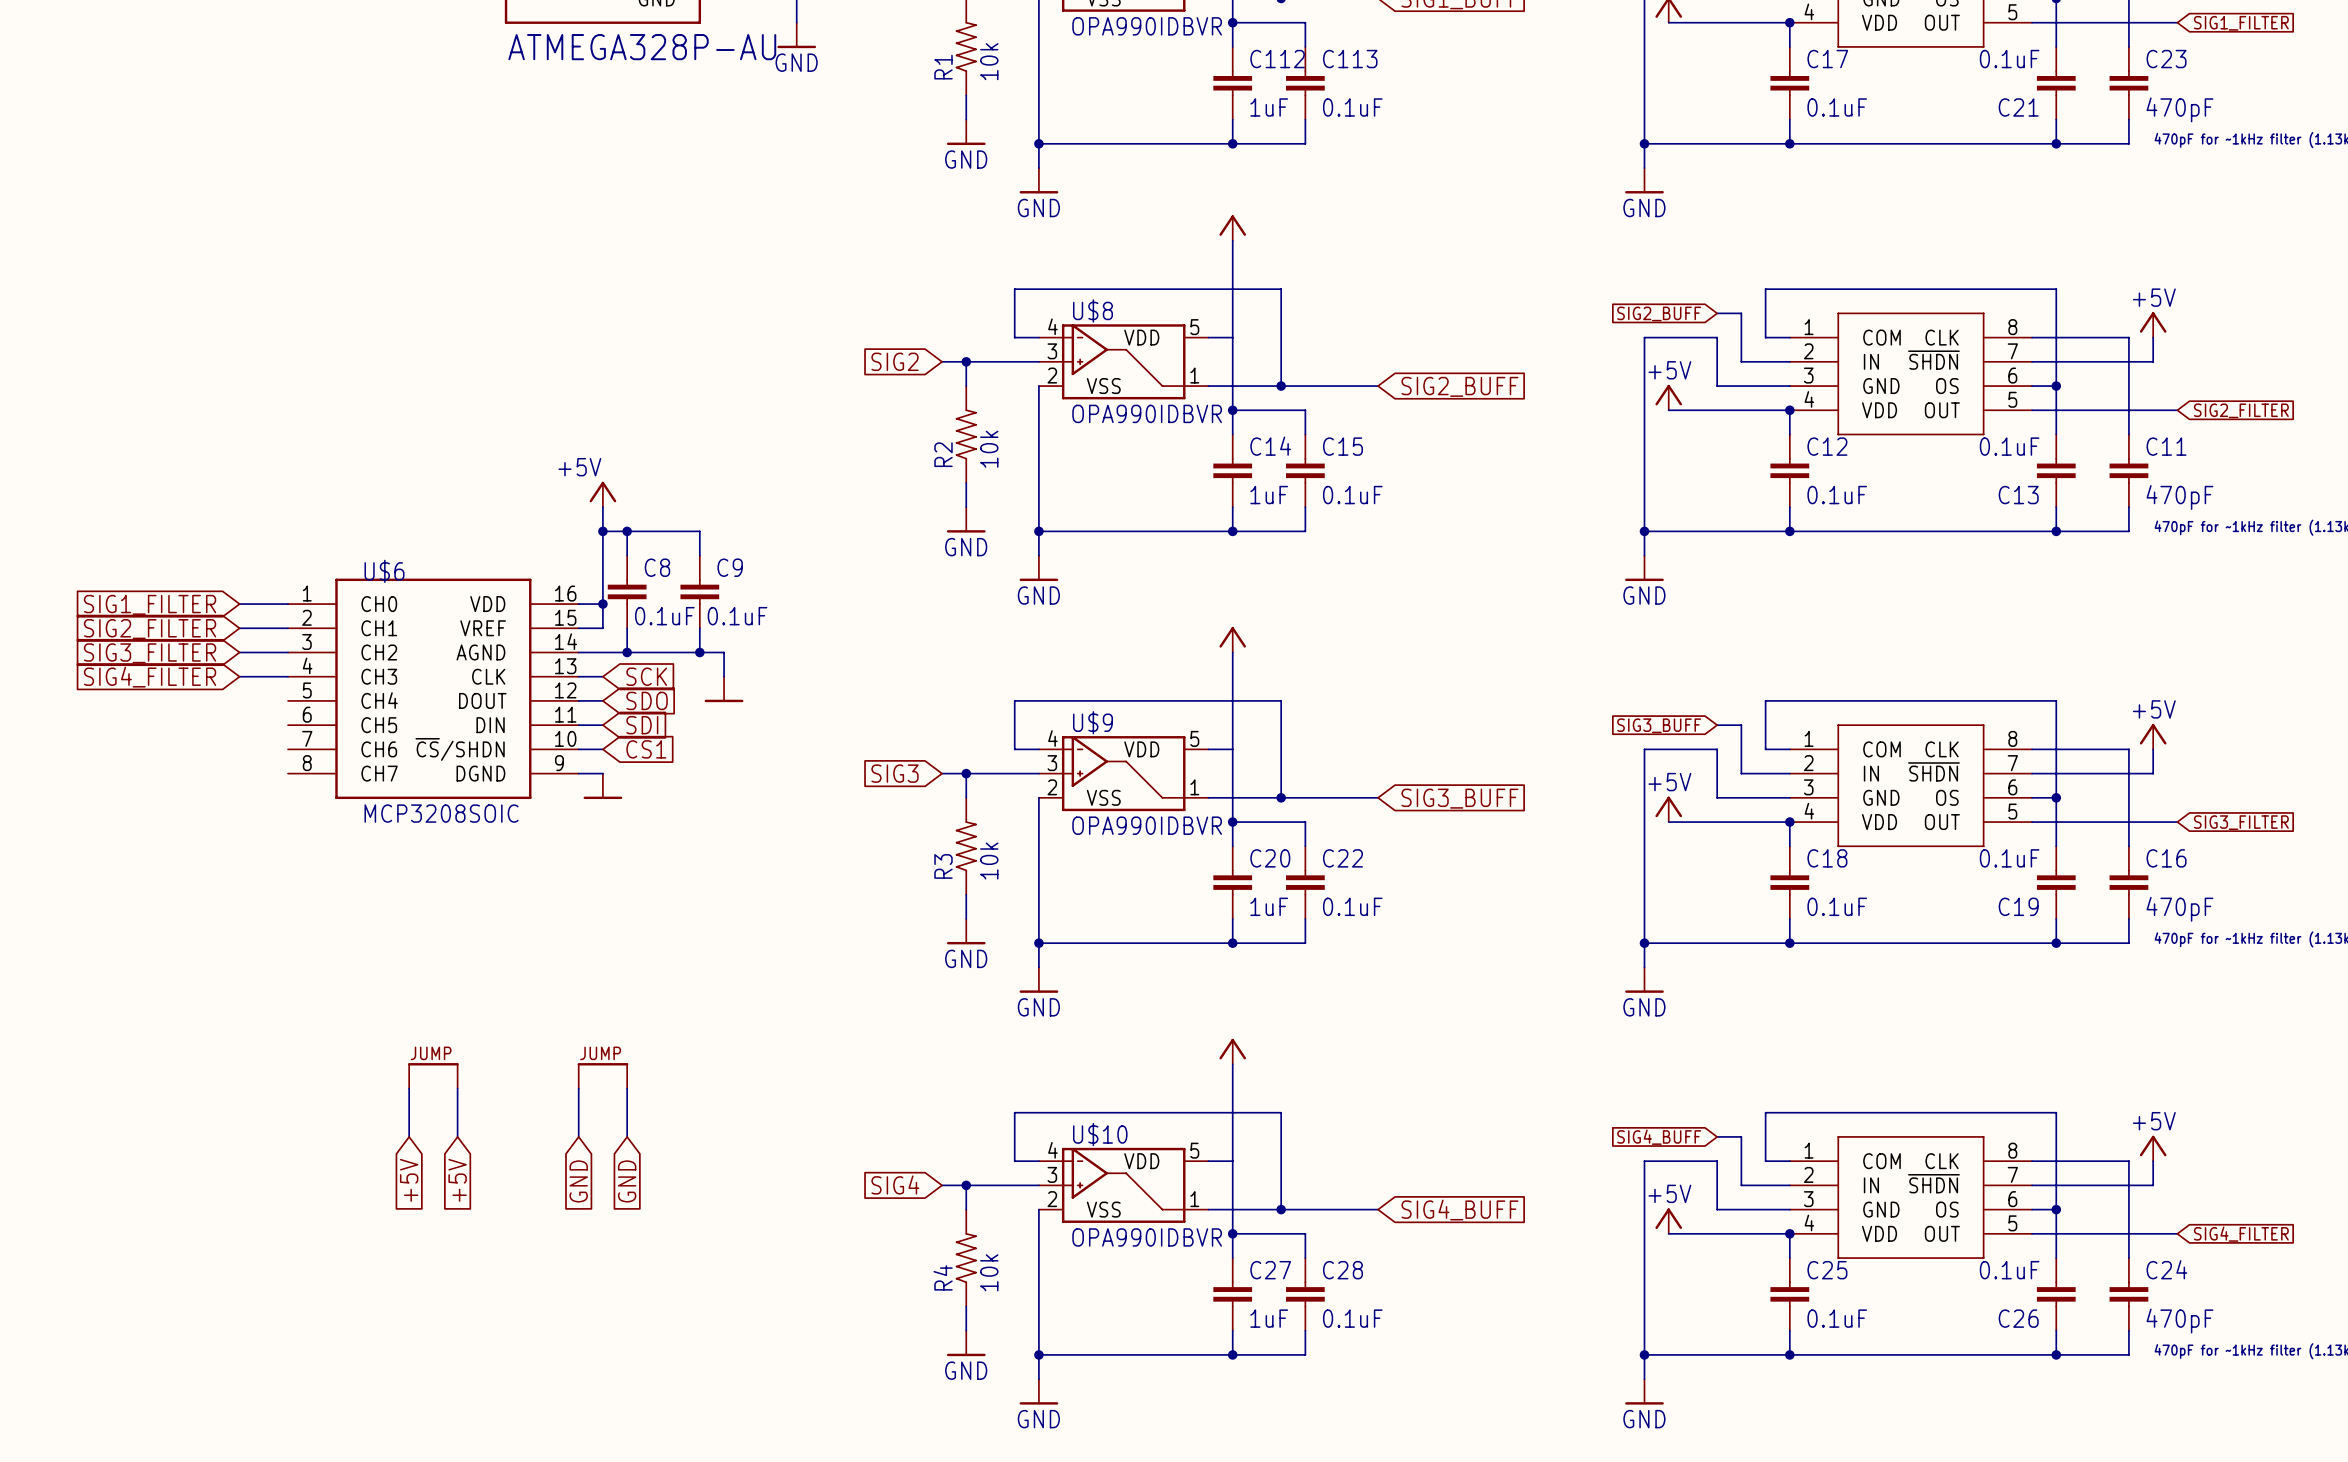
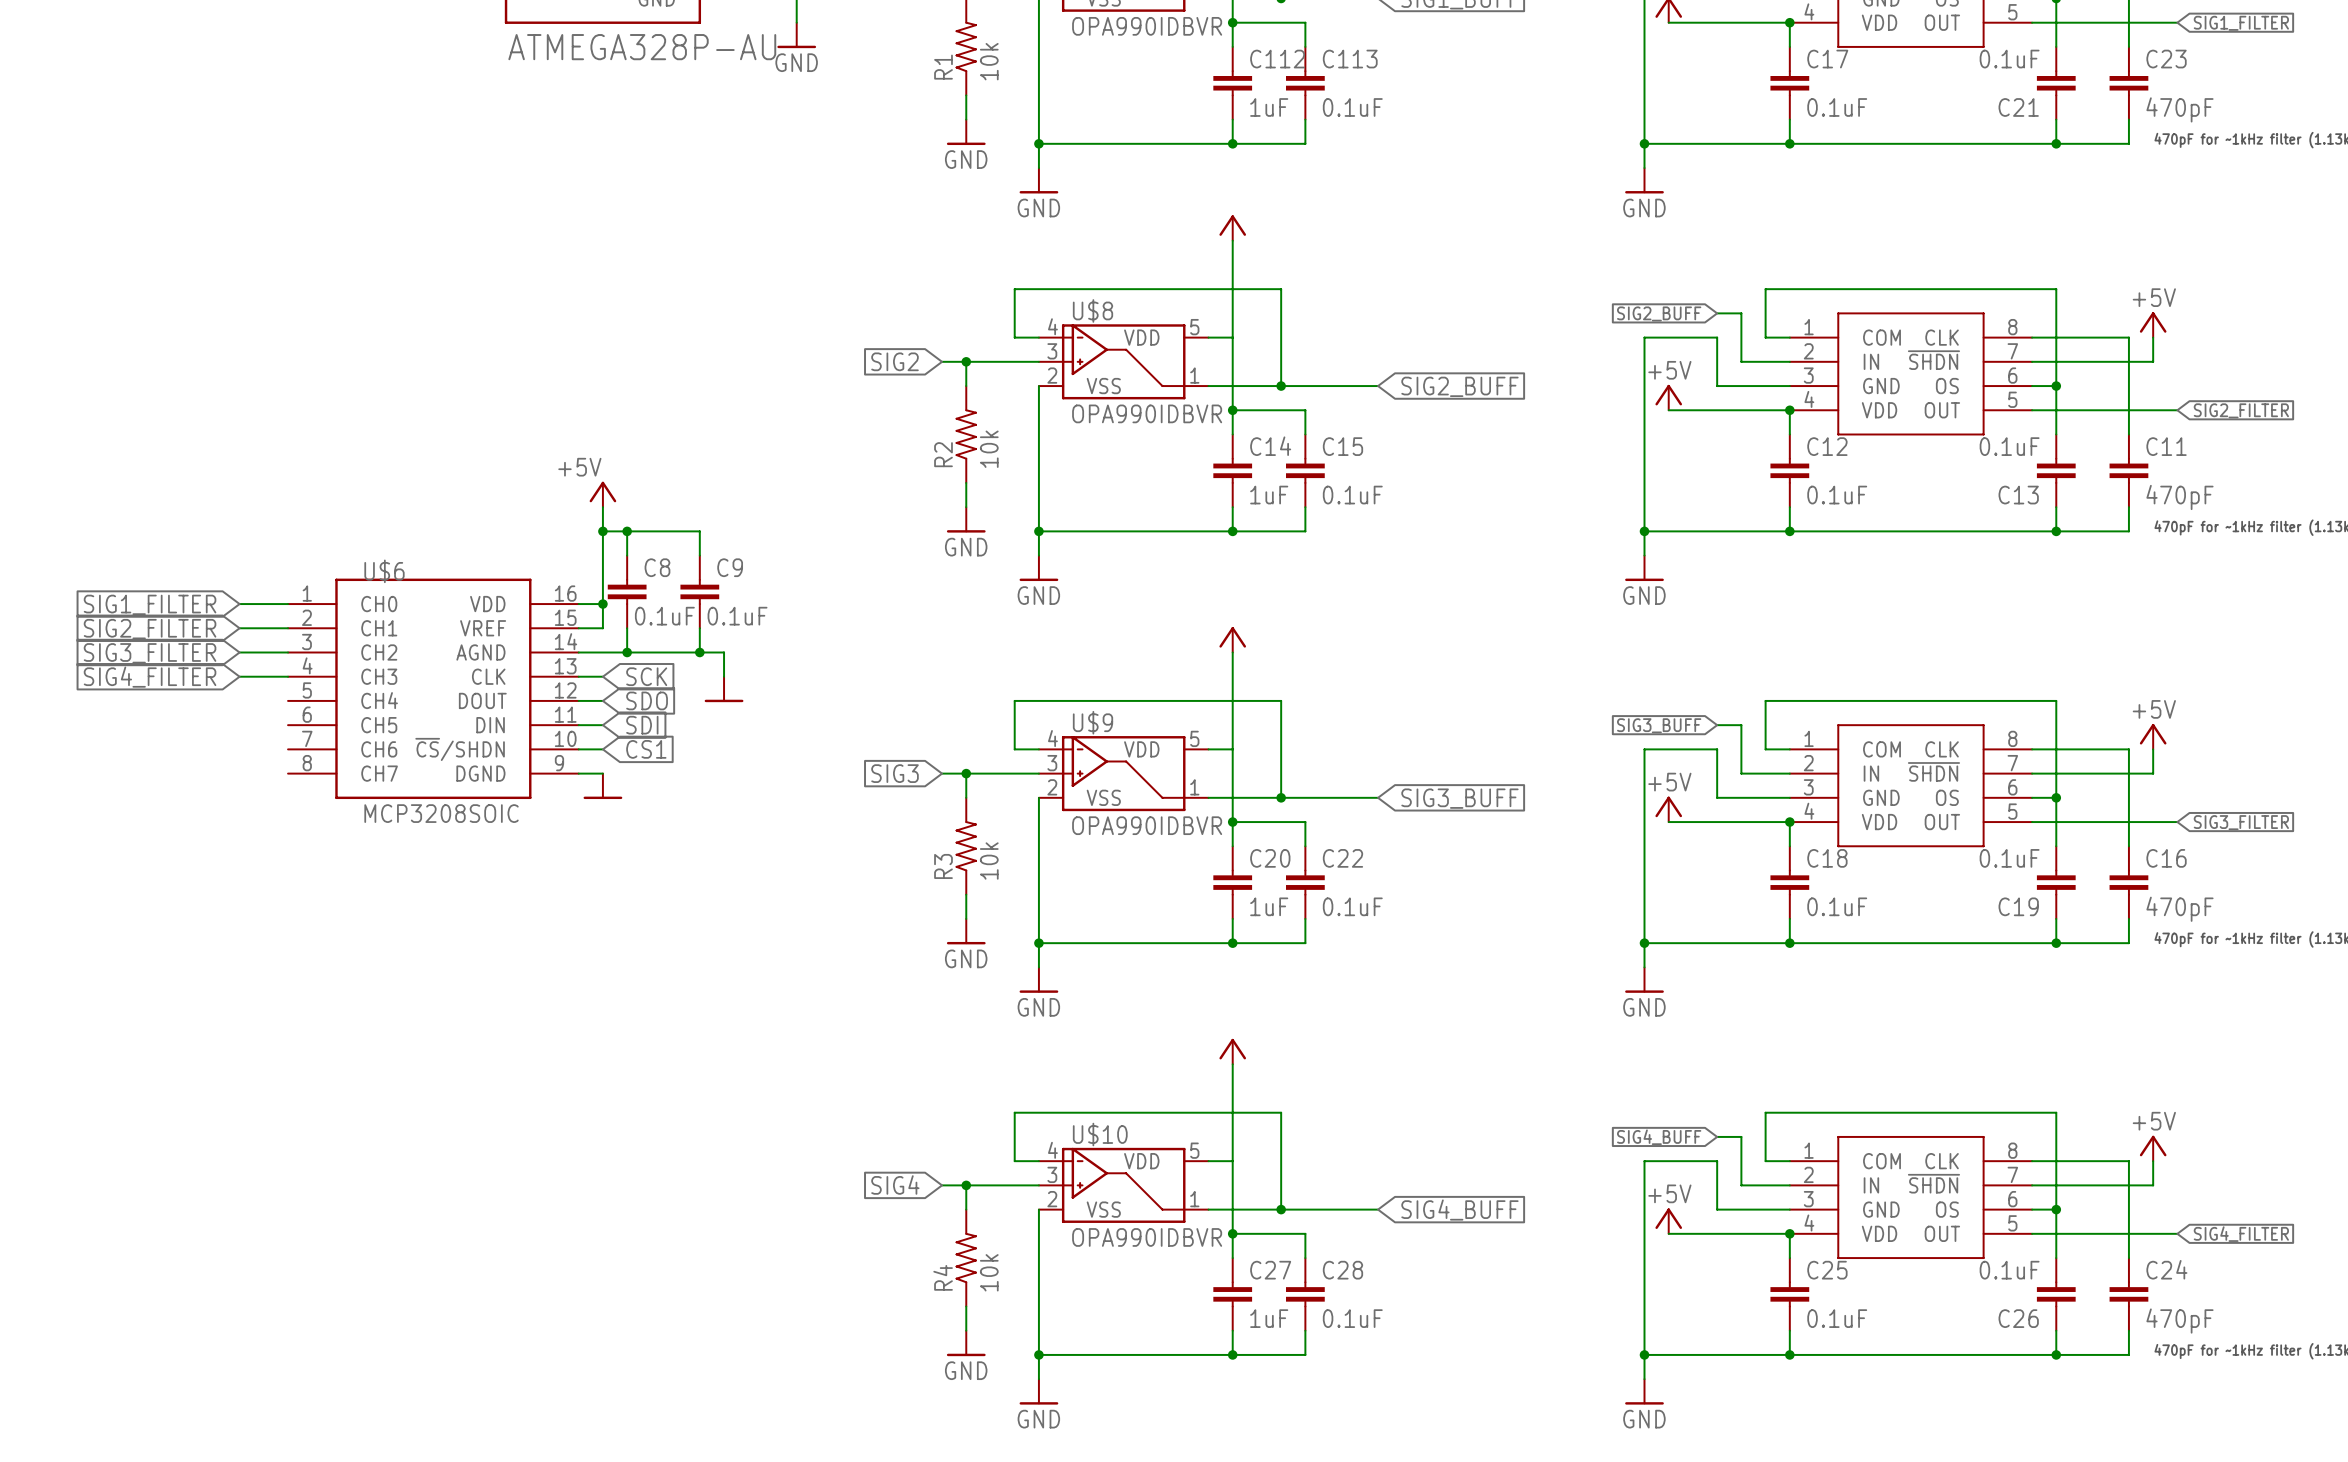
part: (433, 1075) -> none
part: (602, 1075) -> none
wire: (409, 1088) (409, 1136) -> none
wire: (457, 1088) (457, 1136) -> none
wire: (578, 1088) (578, 1136) -> none
wire: (627, 1088) (627, 1136) -> none
global label: +5V (409, 1180) -> none
global label: +5V (457, 1180) -> none
global label: GND (578, 1181) -> none
global label: GND (627, 1181) -> none

